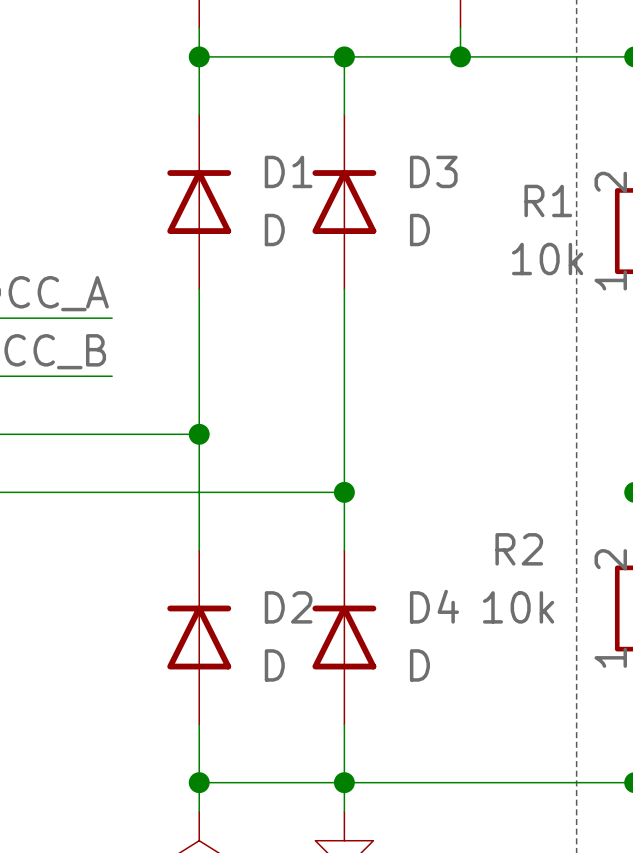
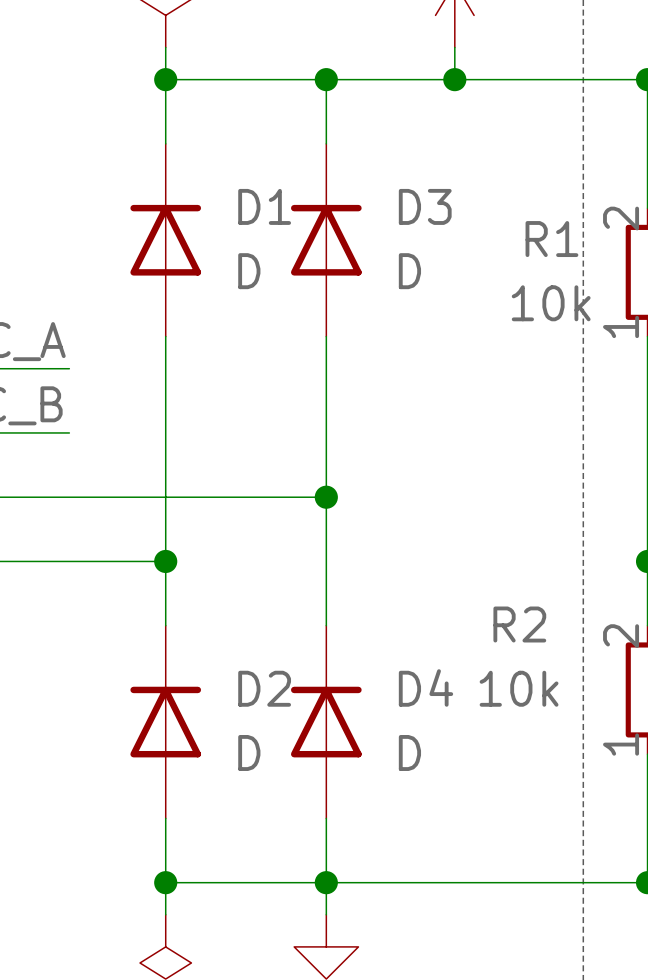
junction position: (199, 434) -> (165, 561)
wire: (199, 492) (344, 492) -> (165, 497) (326, 497)
junction position: (344, 492) -> (326, 497)

